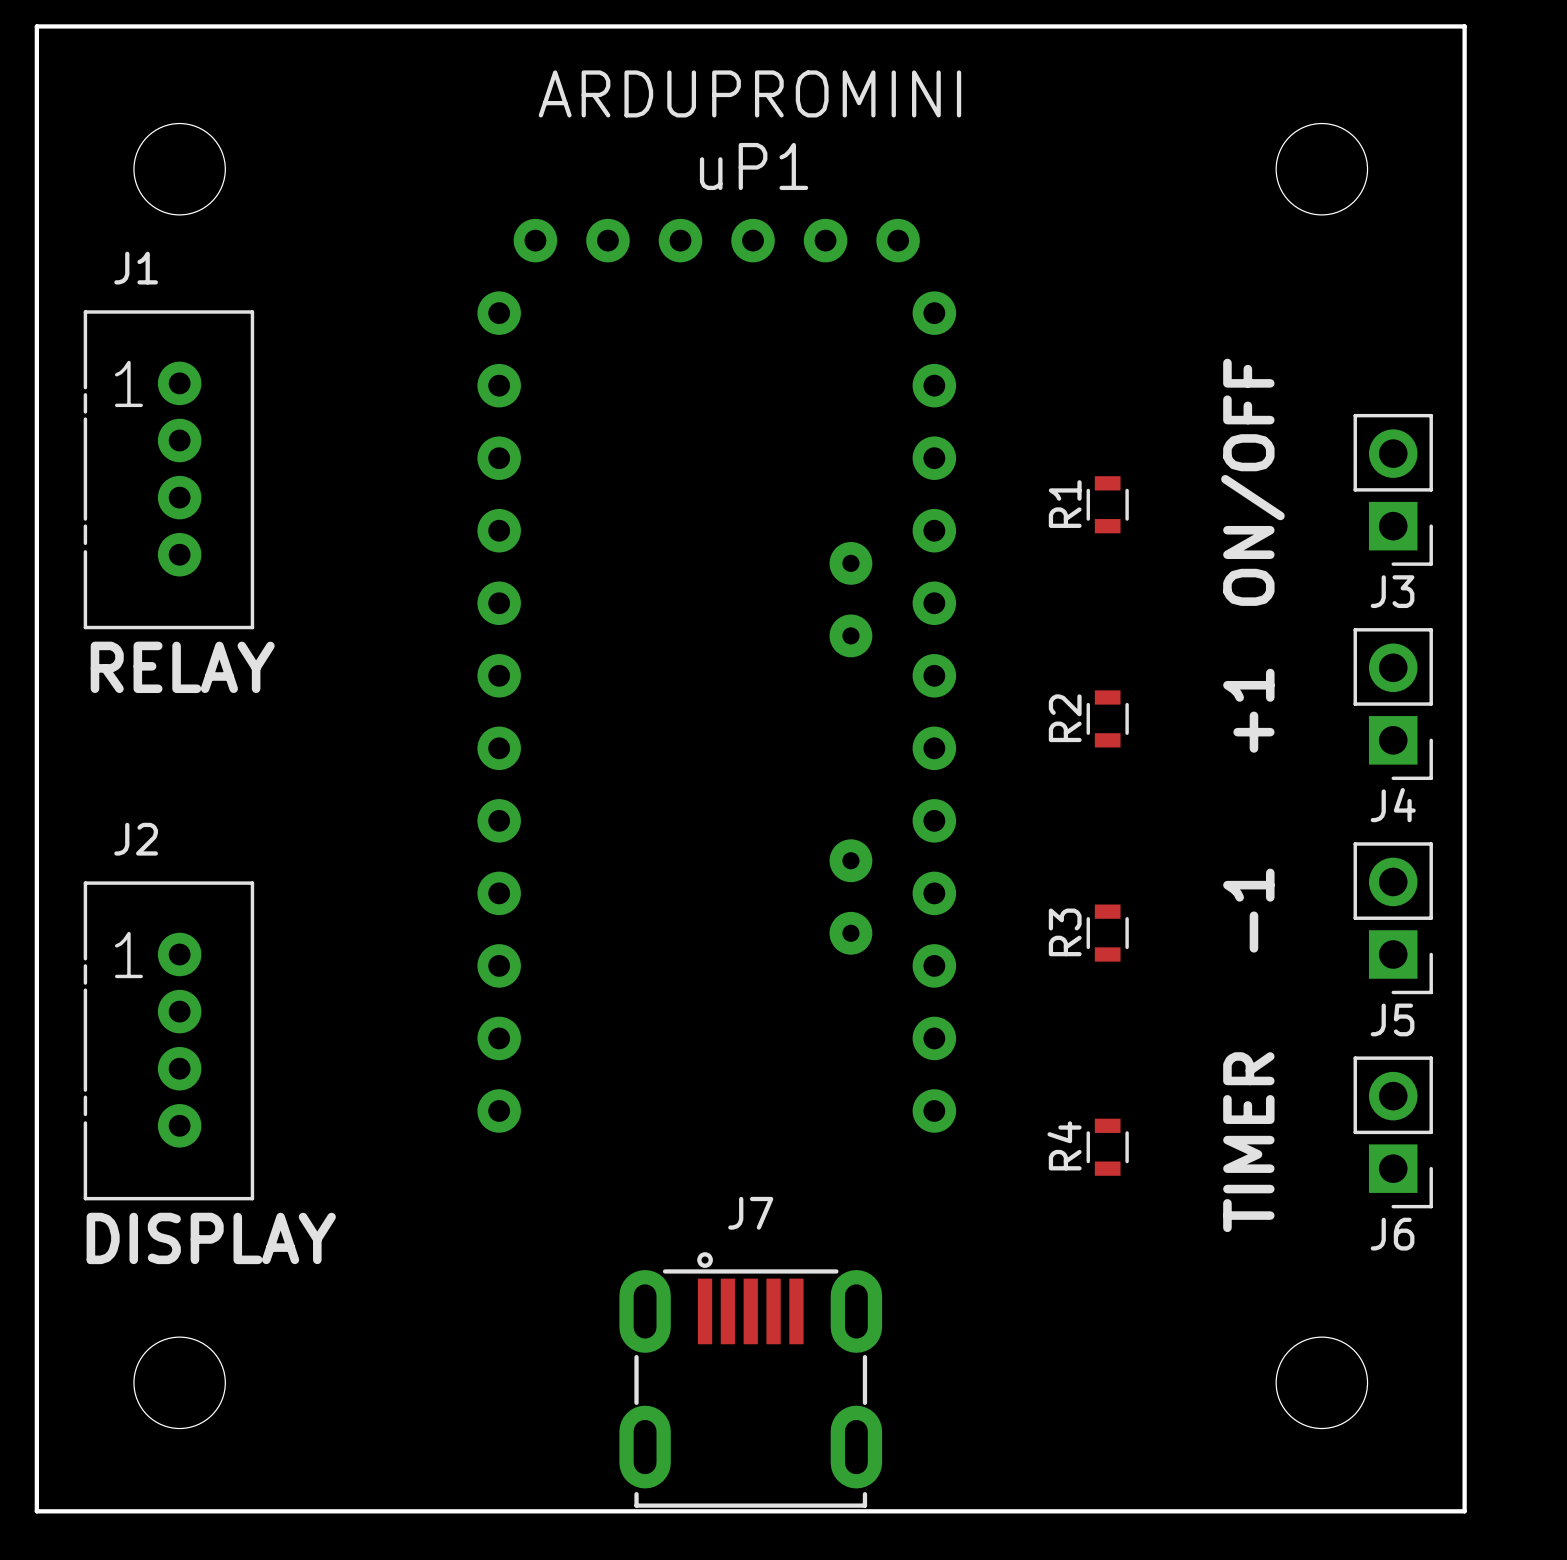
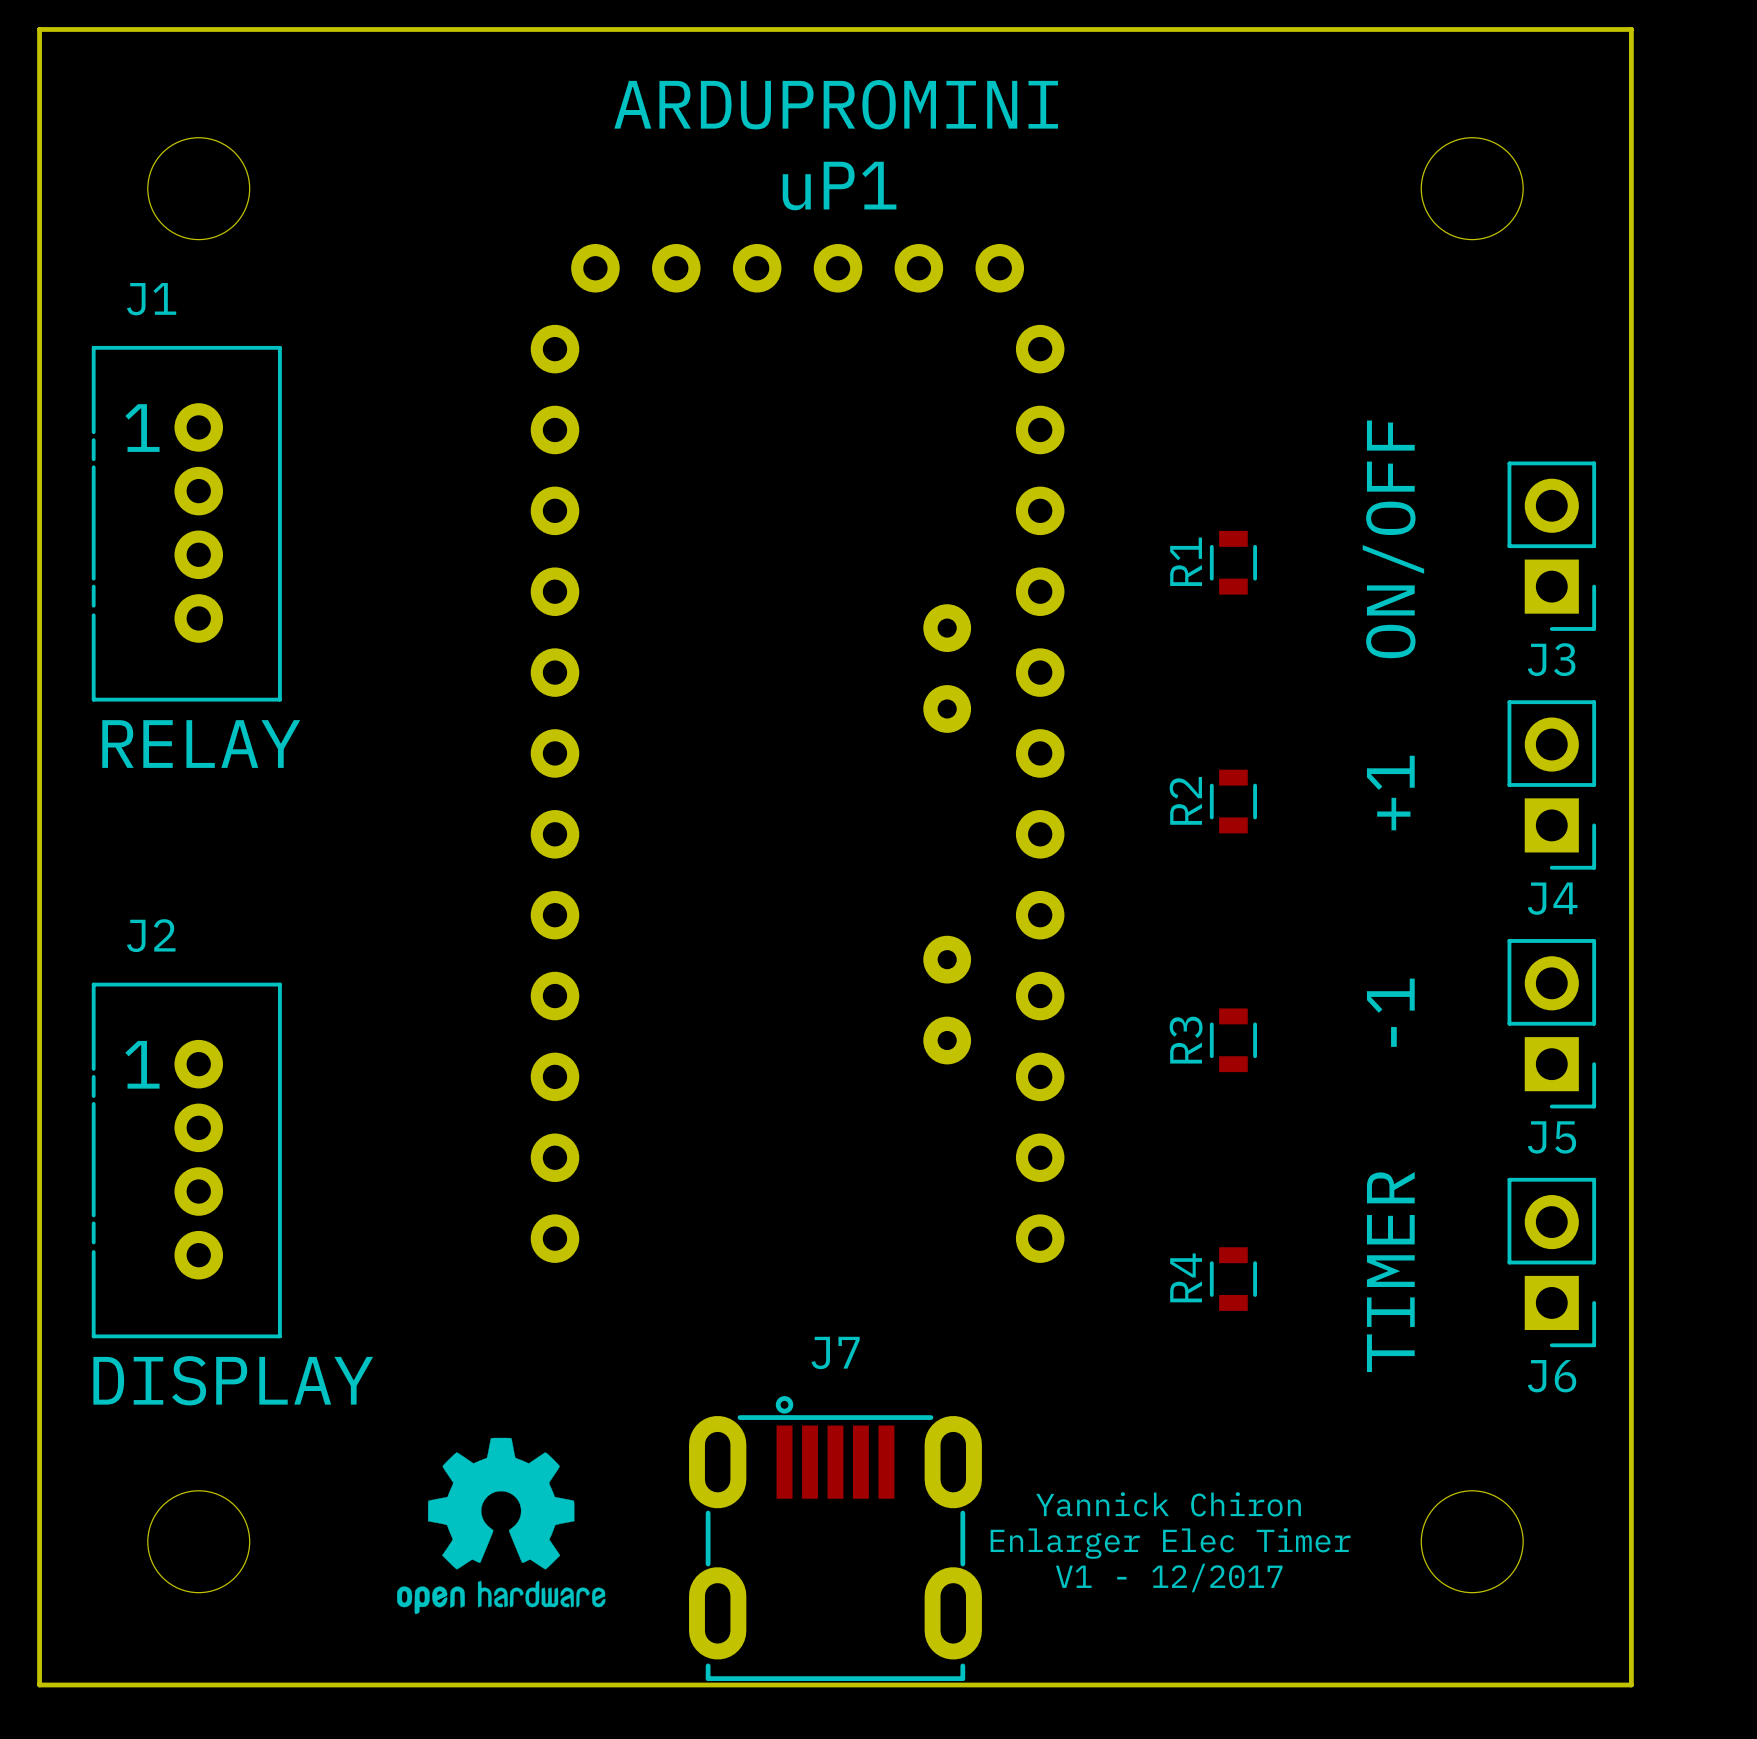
drawing: none -> [397, 1437, 606, 1615]
text: none -> Yannick Chiron (1168, 1504)
text: none -> Enlarger Elec Timer (1170, 1543)
text: none -> V1 - 12/2017 (1169, 1577)

